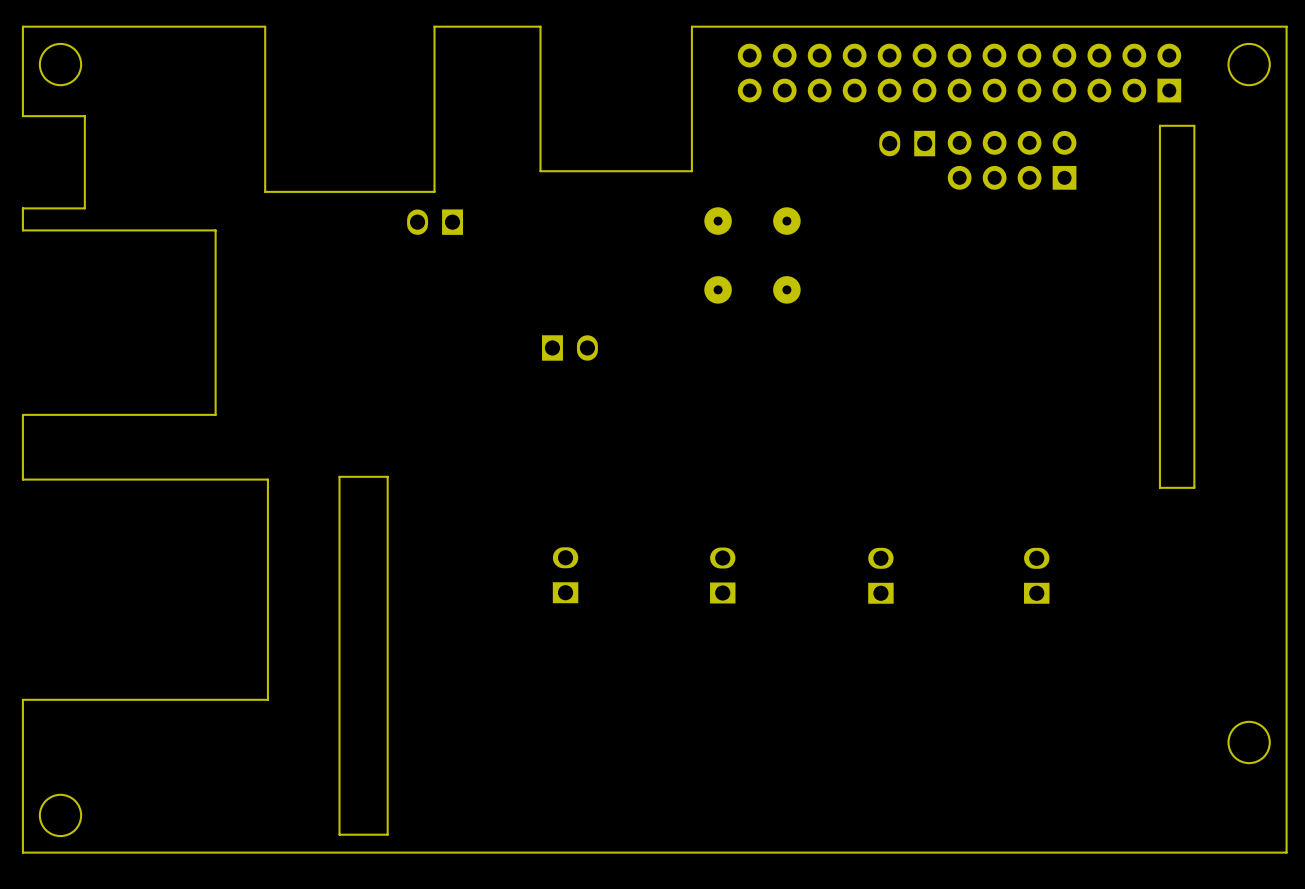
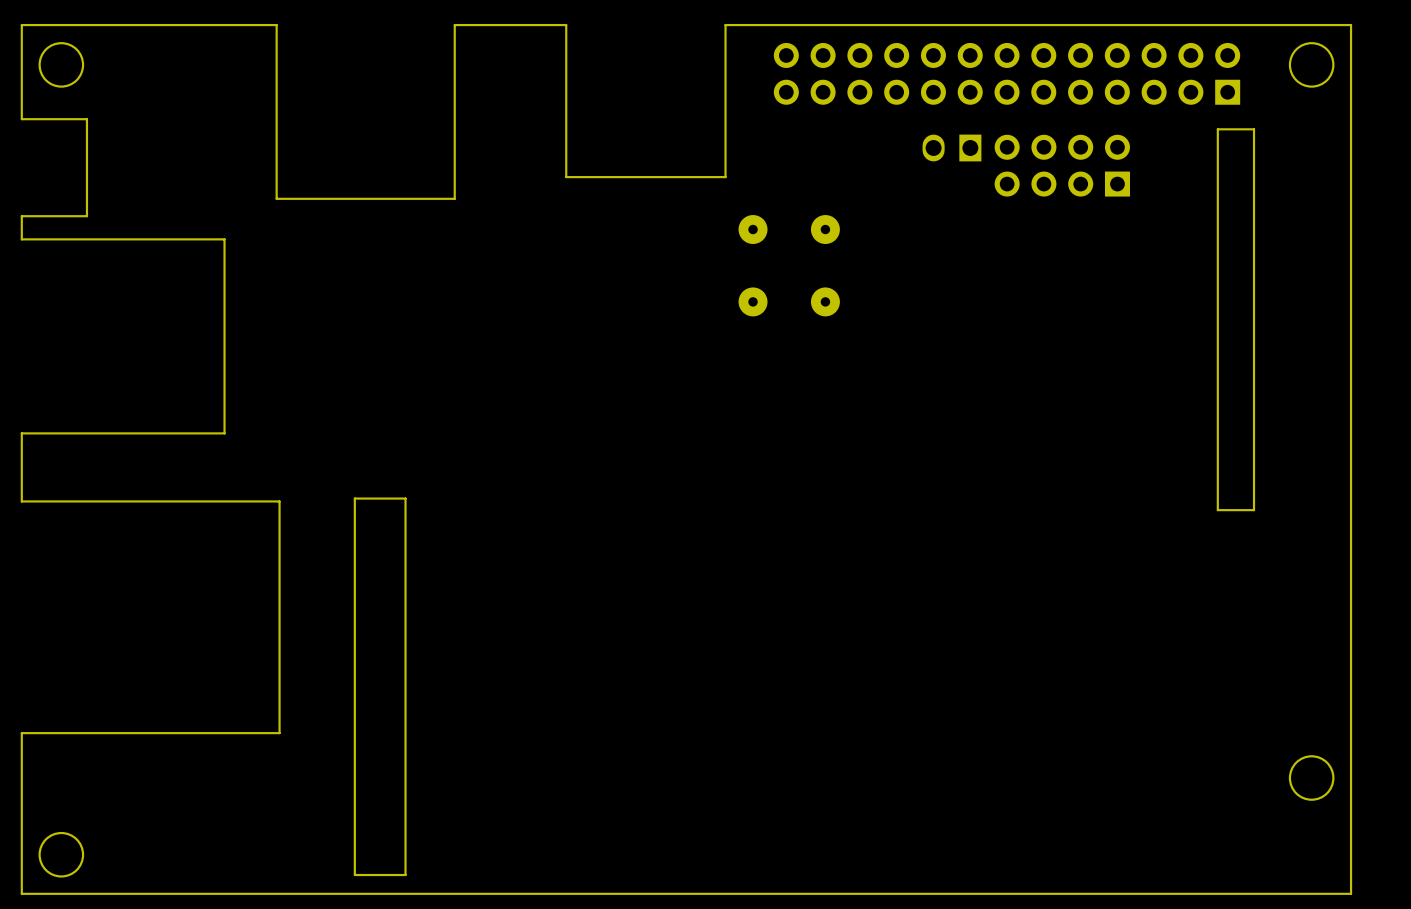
part: (435, 222) -> none
part: (569, 347) -> none
part: (565, 575) -> none
part: (722, 575) -> none
part: (880, 575) -> none
part: (1036, 575) -> none

